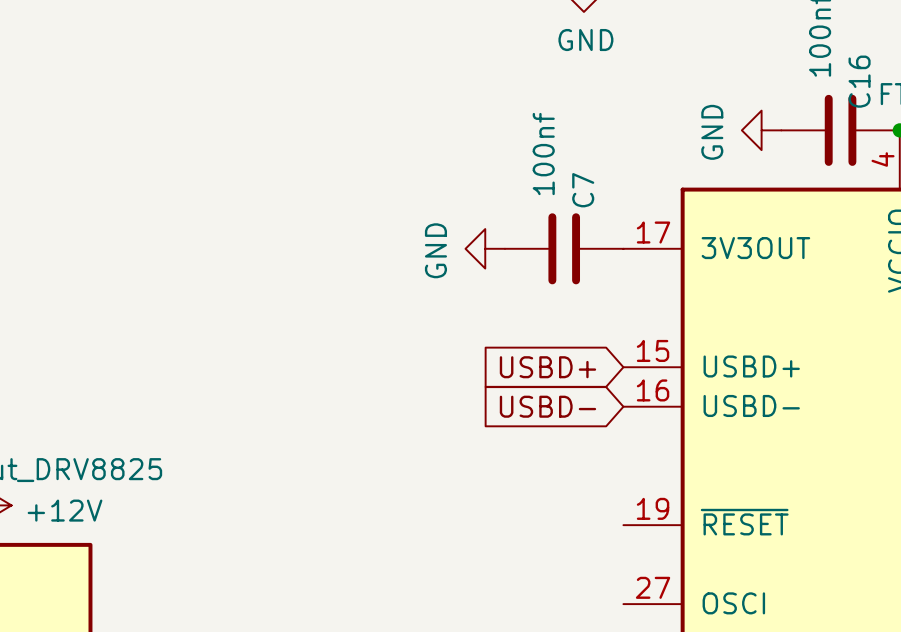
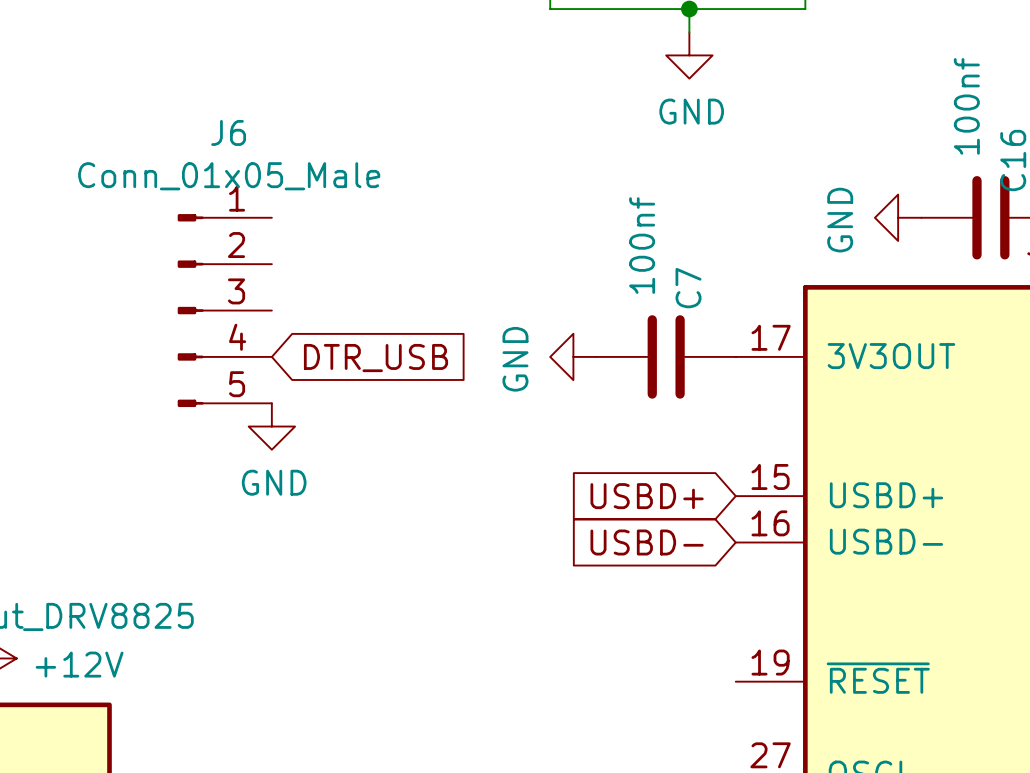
J6: none -> Conn_01x05_Male (224, 310)
global label: none -> DTR_USB (376, 358)
power symbol: none -> GND (271, 426)

